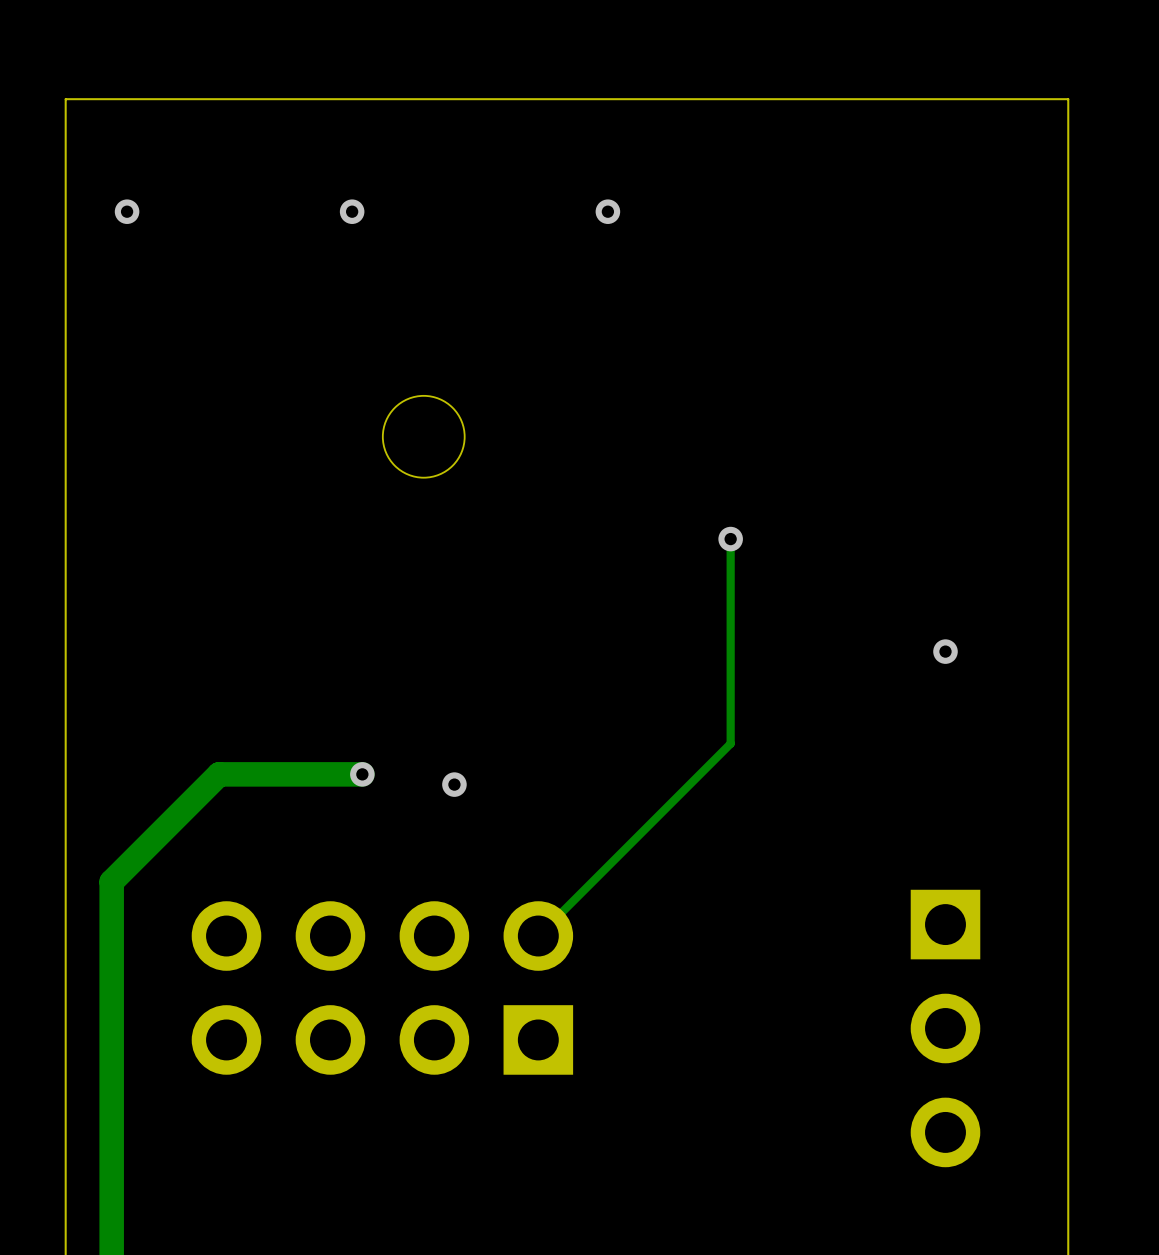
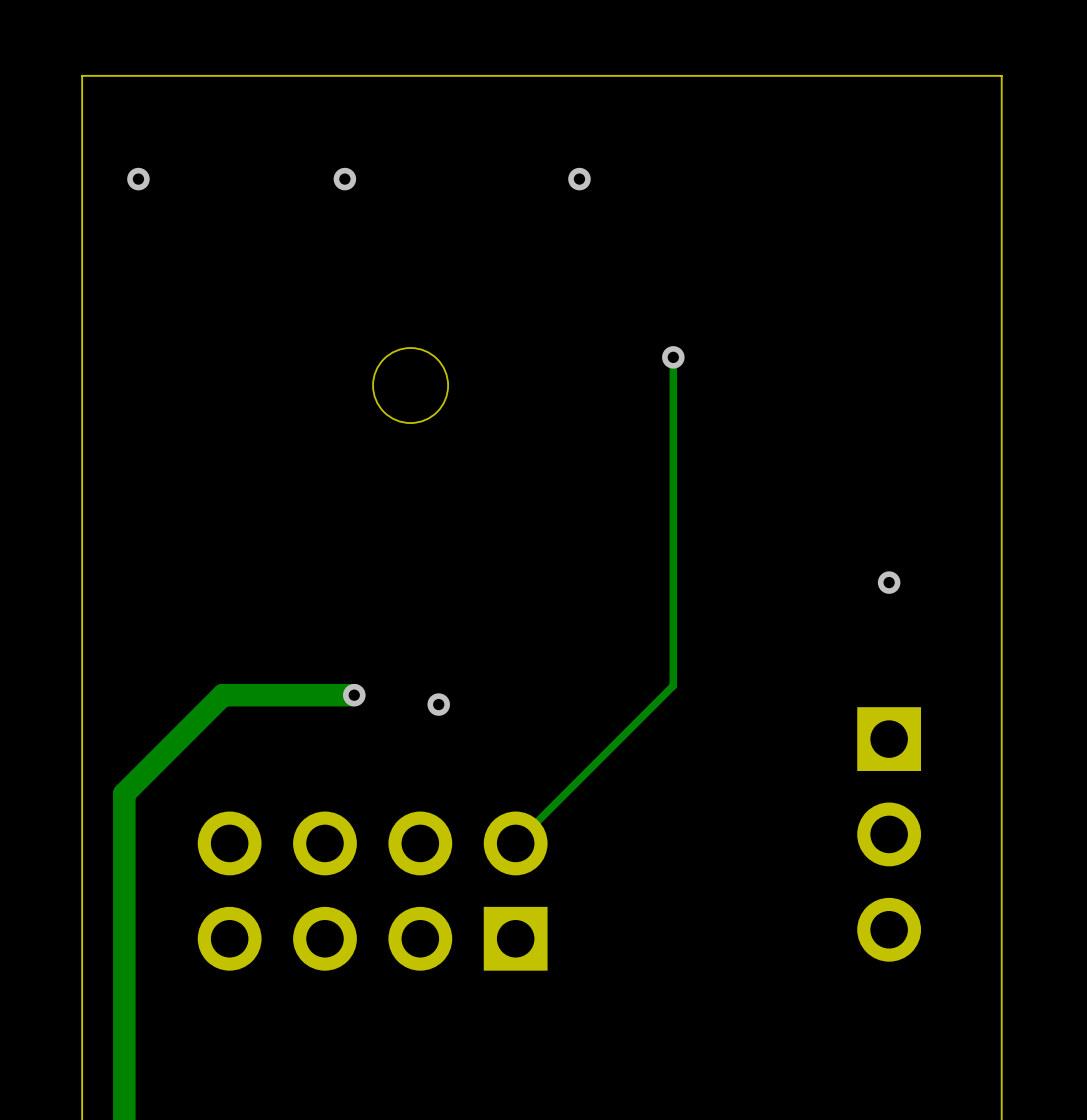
track: (730, 539) (730, 743) (710, 764) -> (673, 357) (673, 685)
via position: (730, 539) -> (673, 357)
part position: (945, 1028) -> (889, 834)

